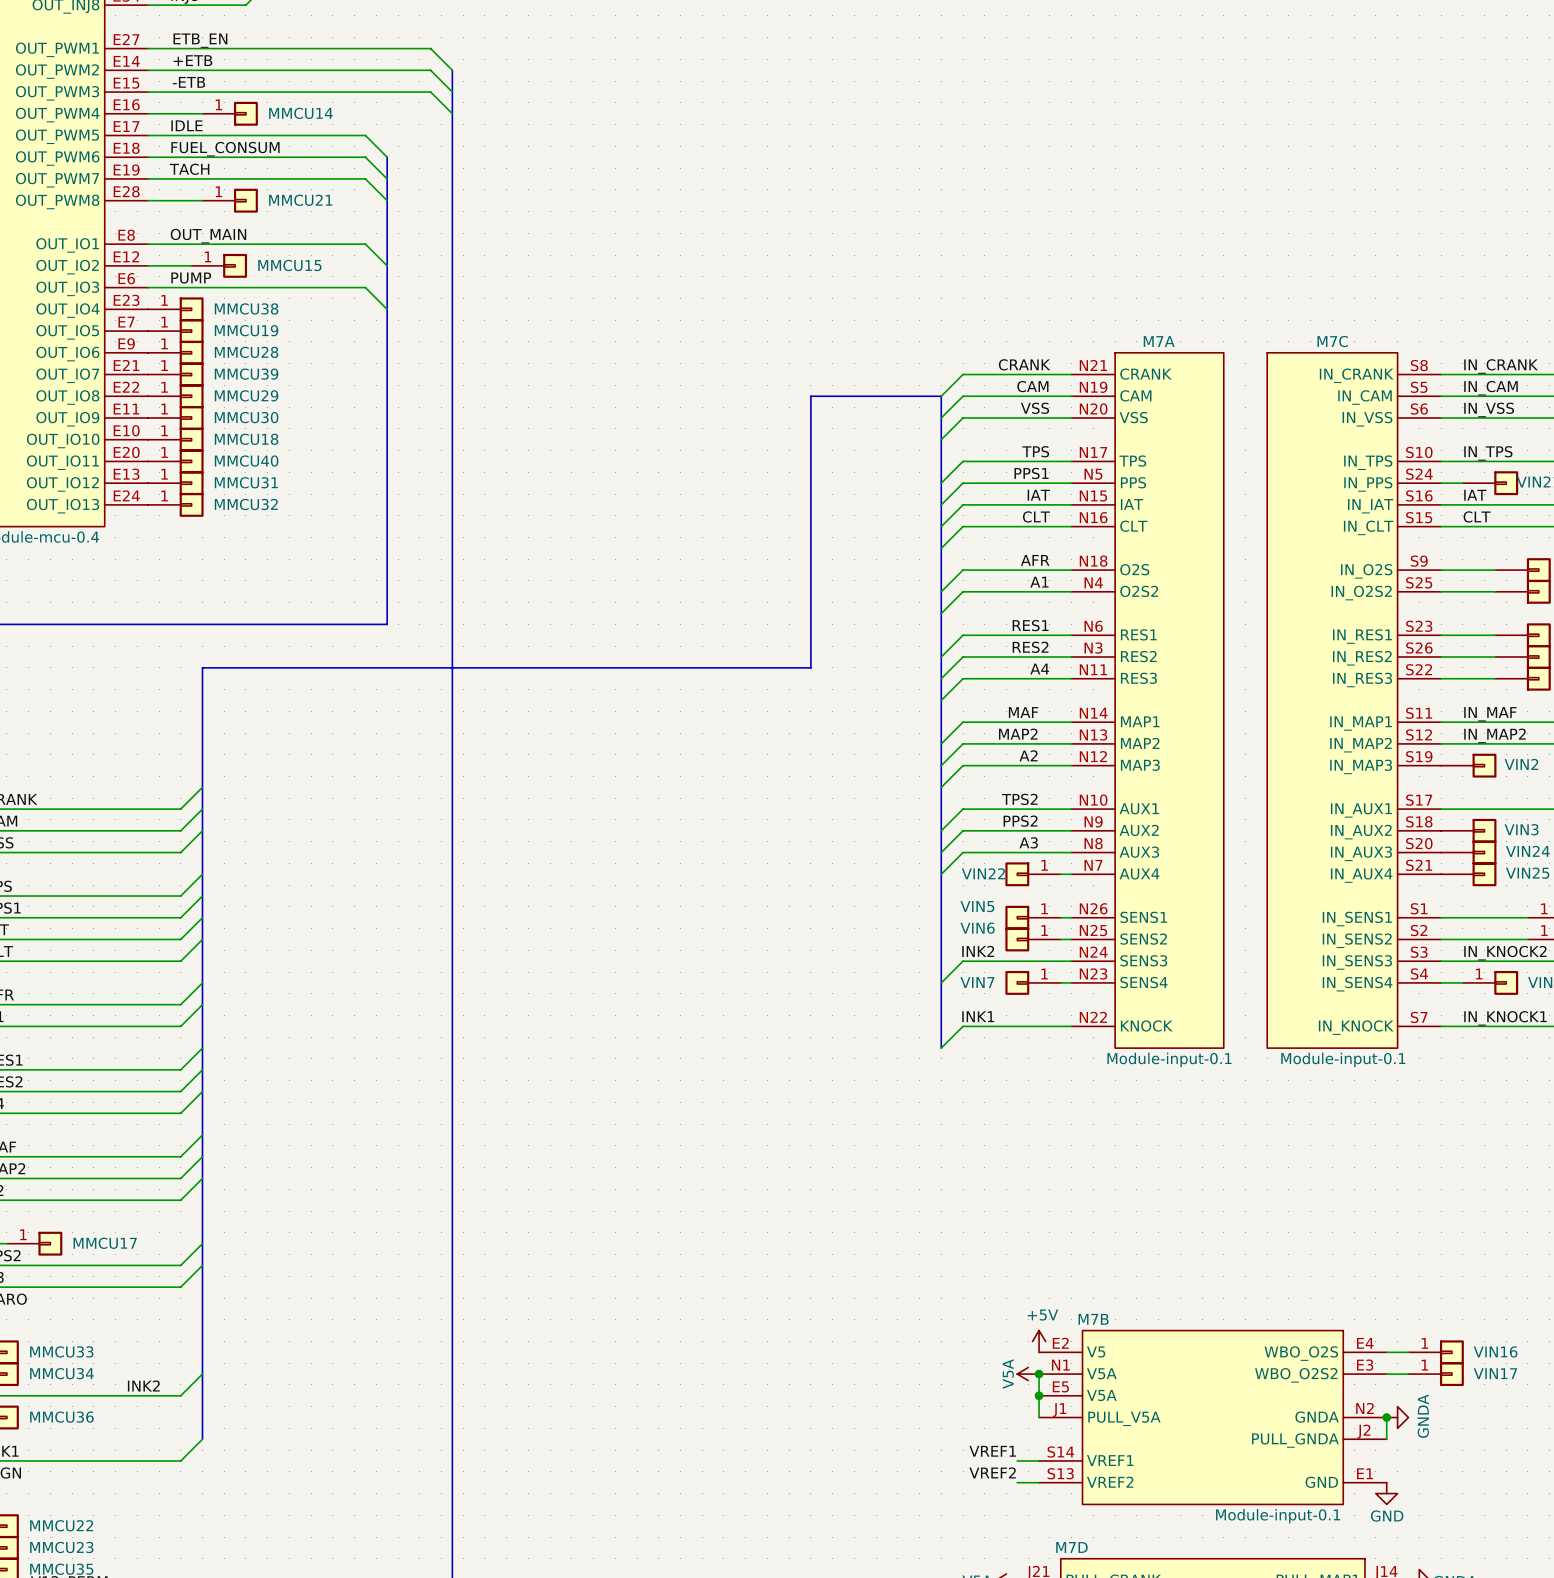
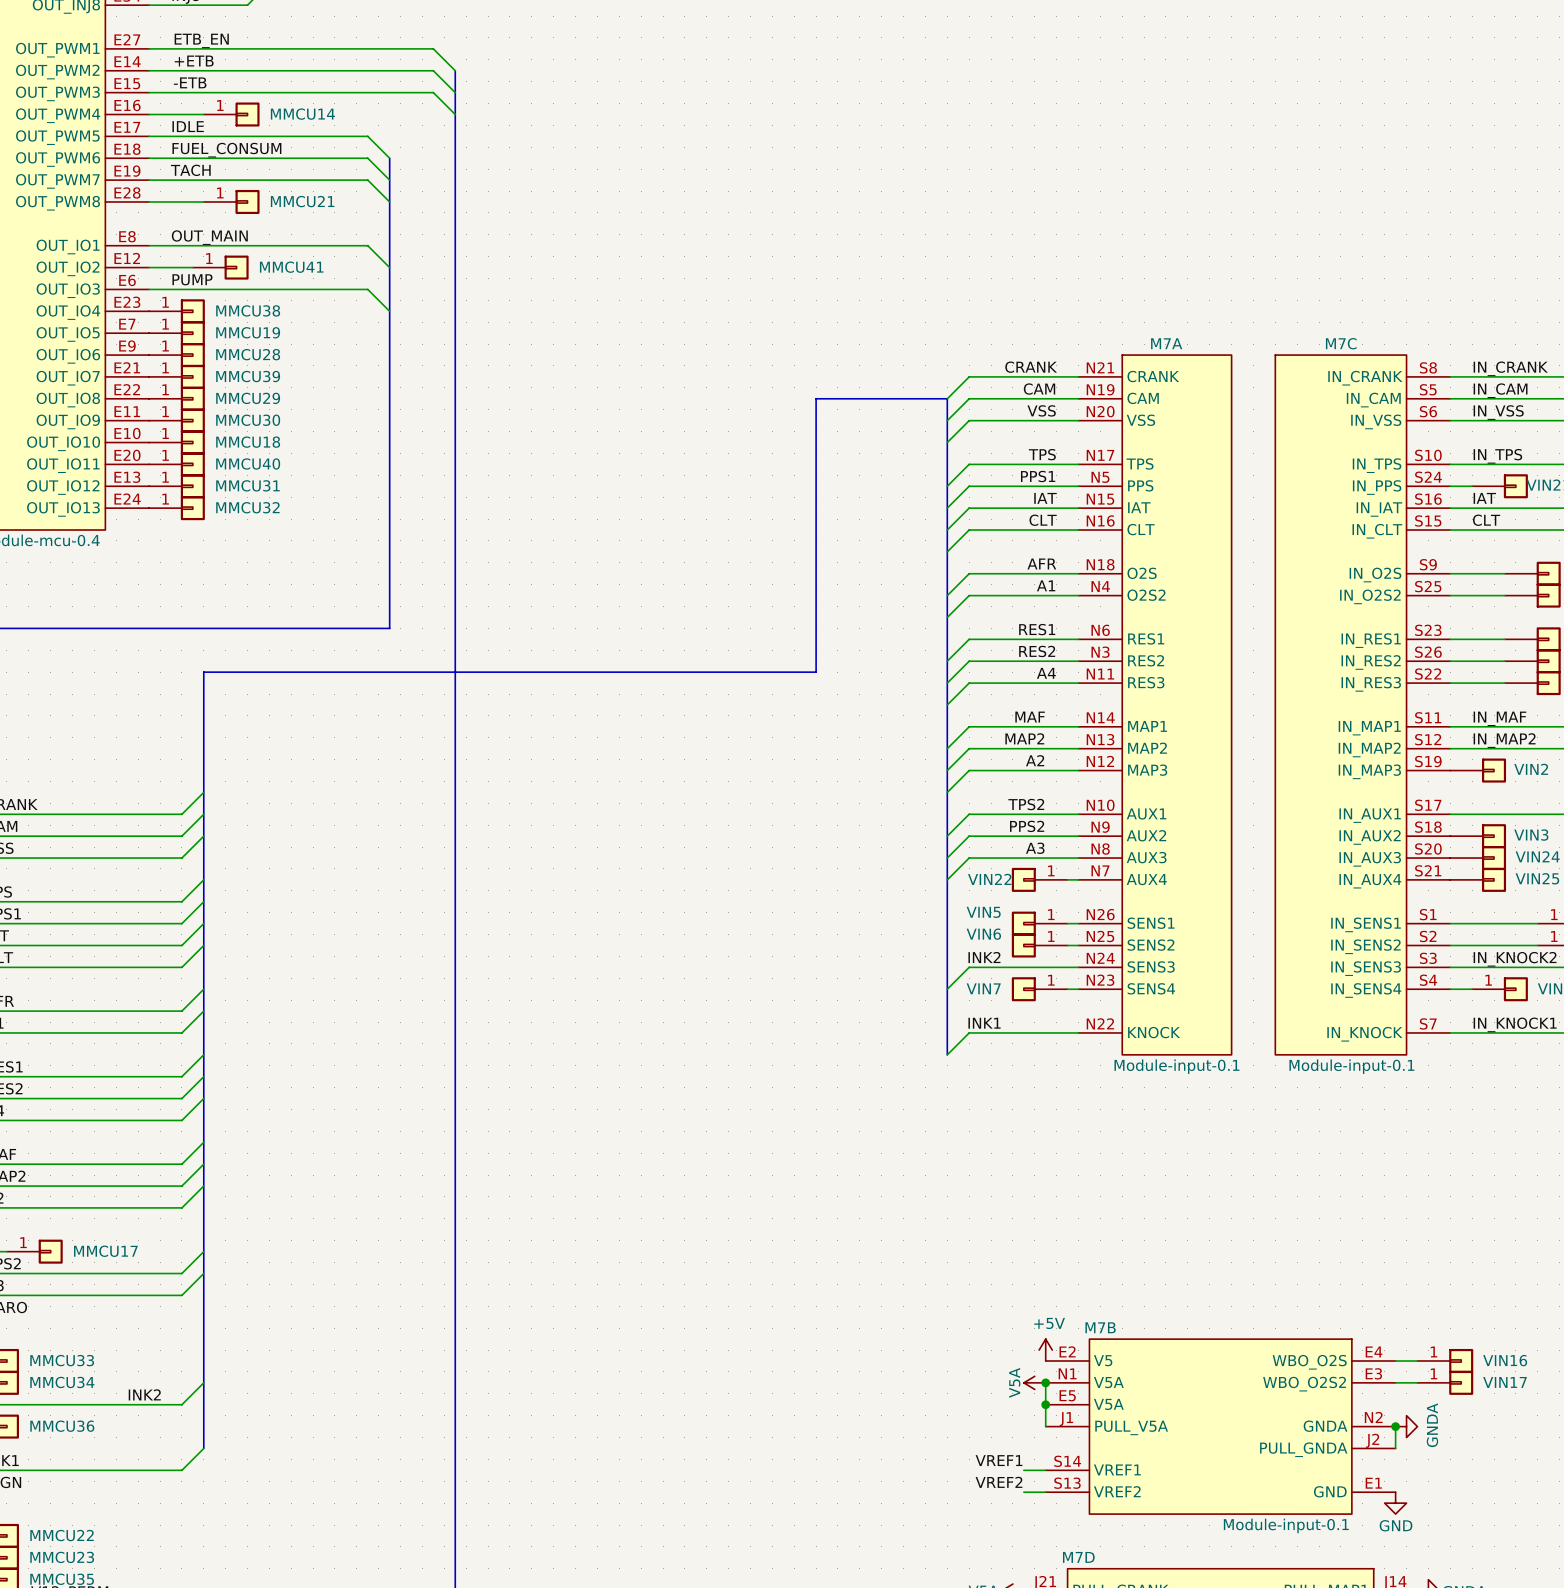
MMCU15 name: MMCU15 (289, 265) -> MMCU41 (291, 267)

